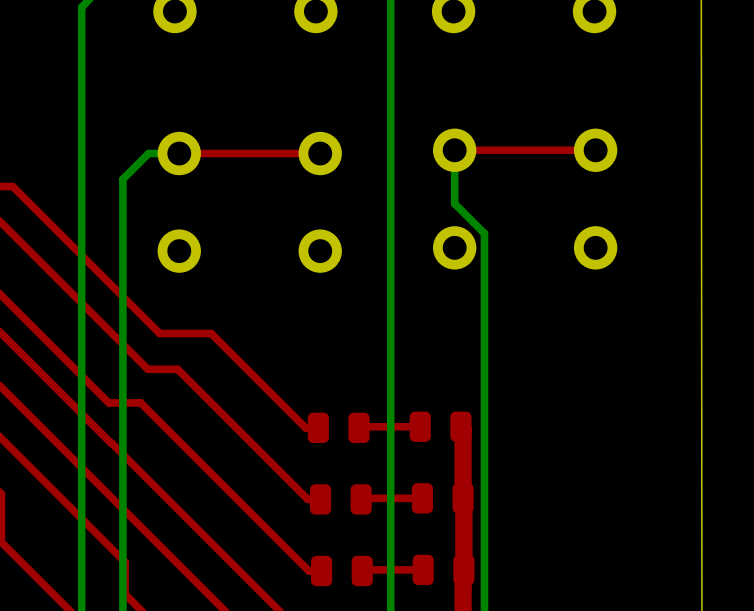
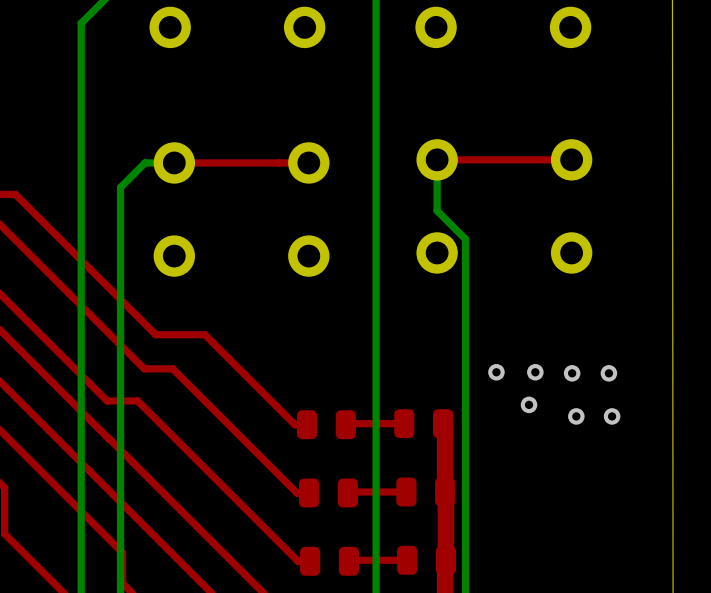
via: none -> (496, 372)
via: none -> (535, 372)
via: none -> (572, 373)
via: none -> (608, 373)
via: none -> (529, 404)
via: none -> (576, 416)
via: none -> (612, 416)

